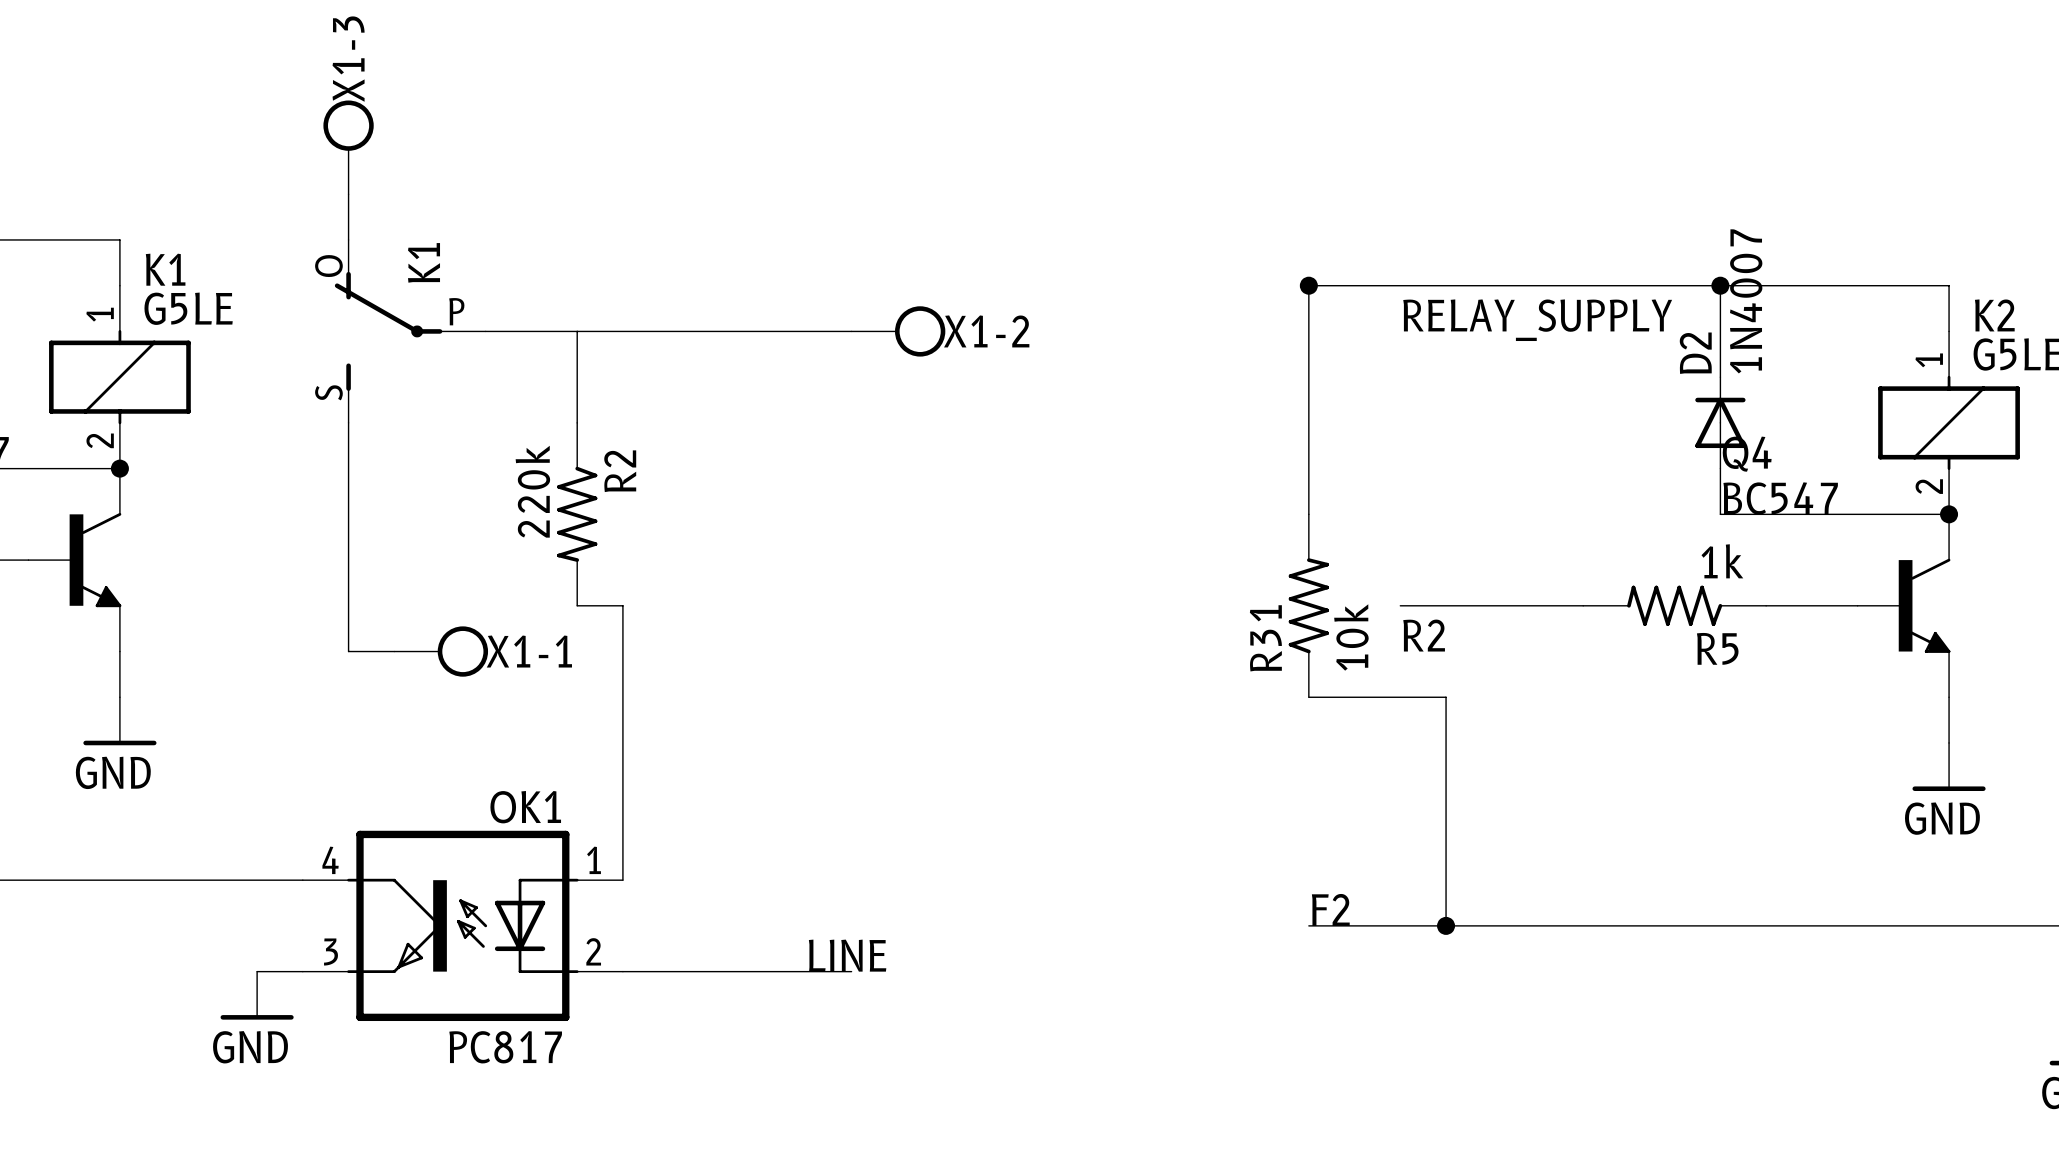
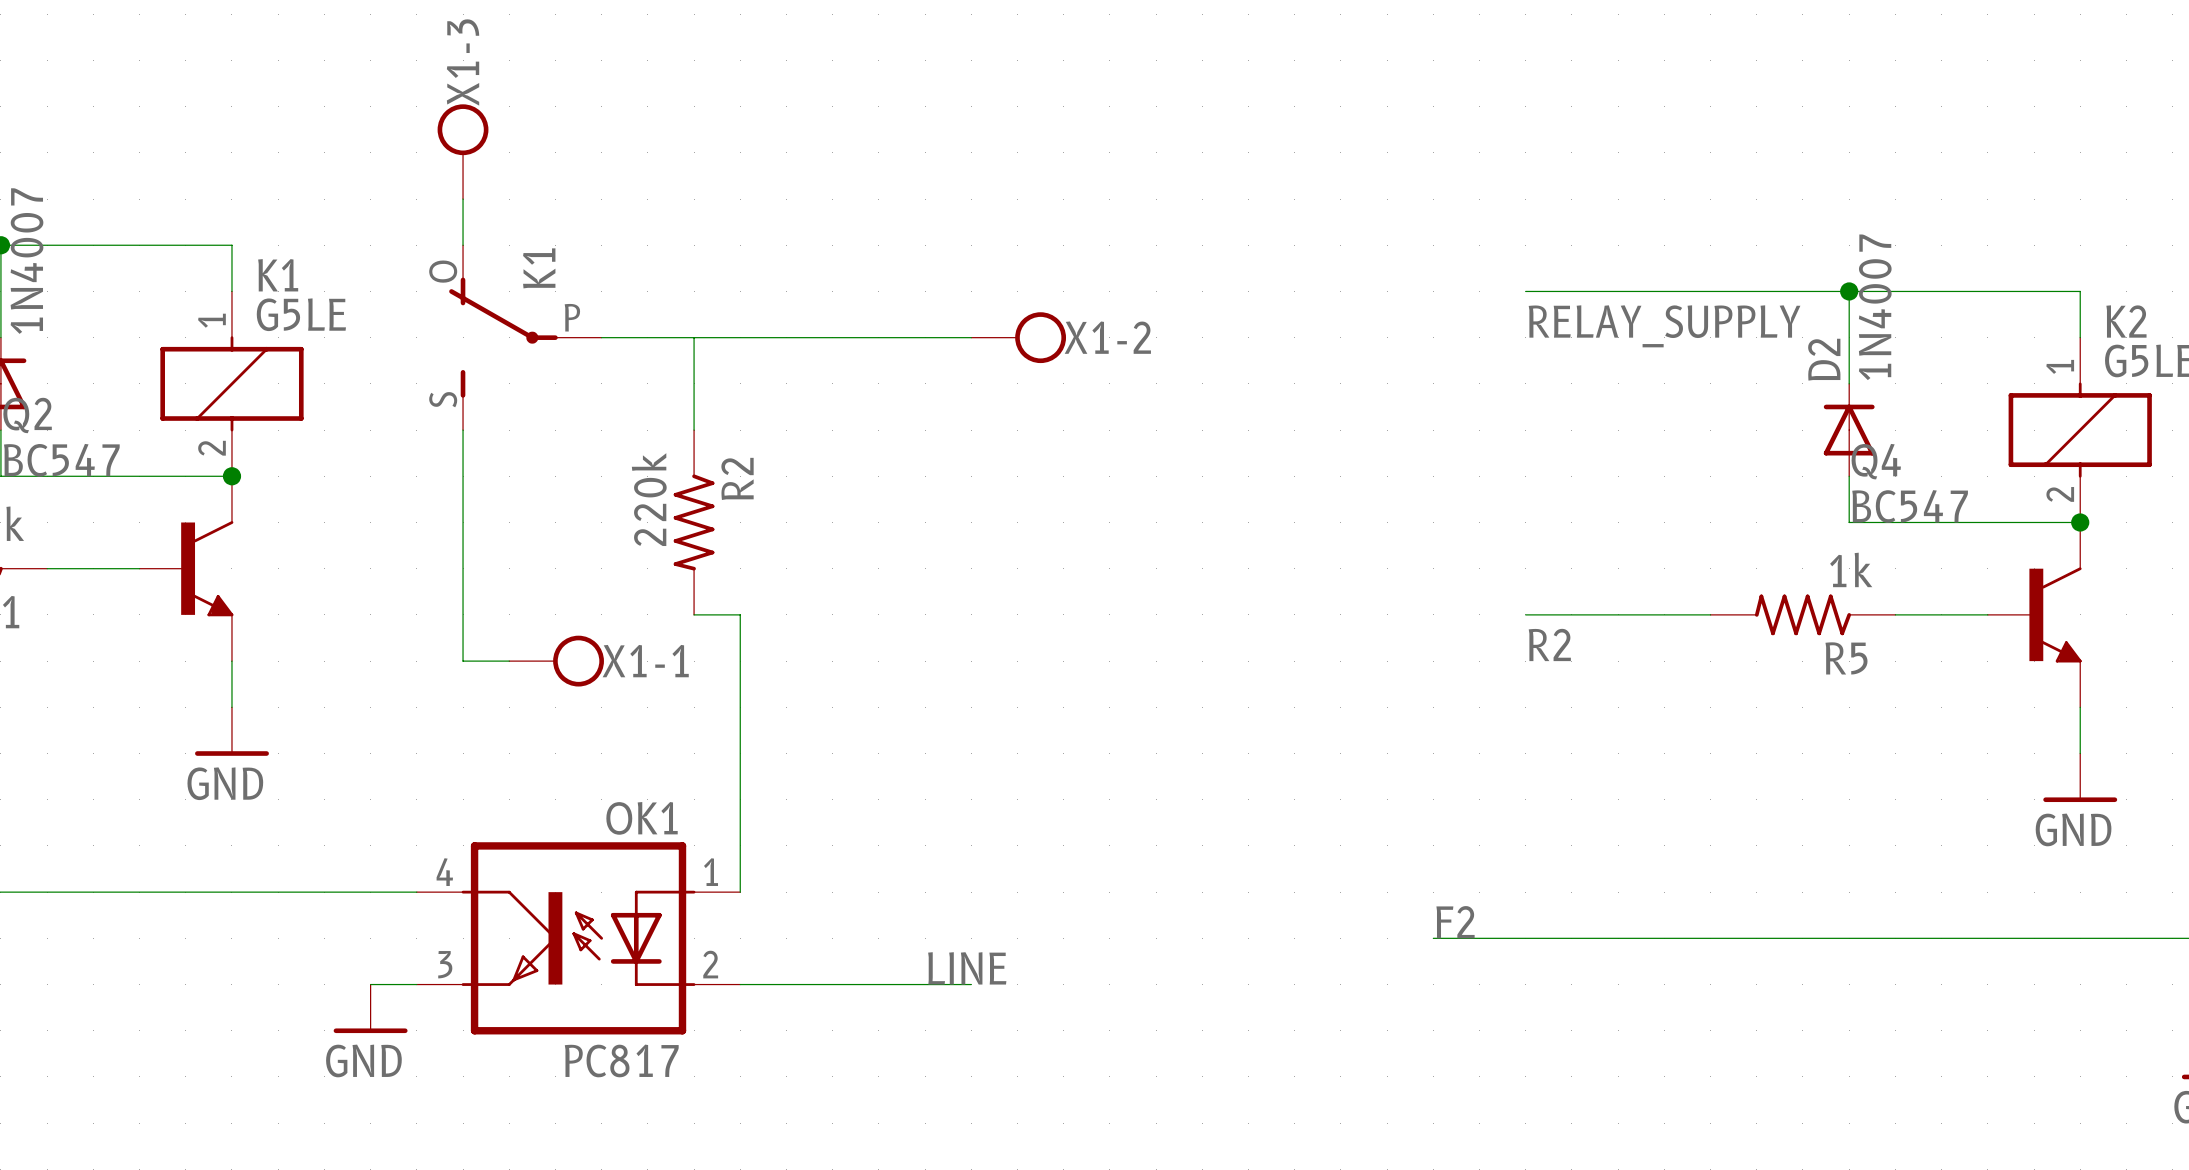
junction: (1308, 285) -> none
wire: (1400, 285) (1308, 285) (1308, 514) -> none
R31: 10k (1308, 605) -> none
wire: (1308, 697) (1446, 697) (1446, 925) -> none
junction: (1446, 925) -> none

